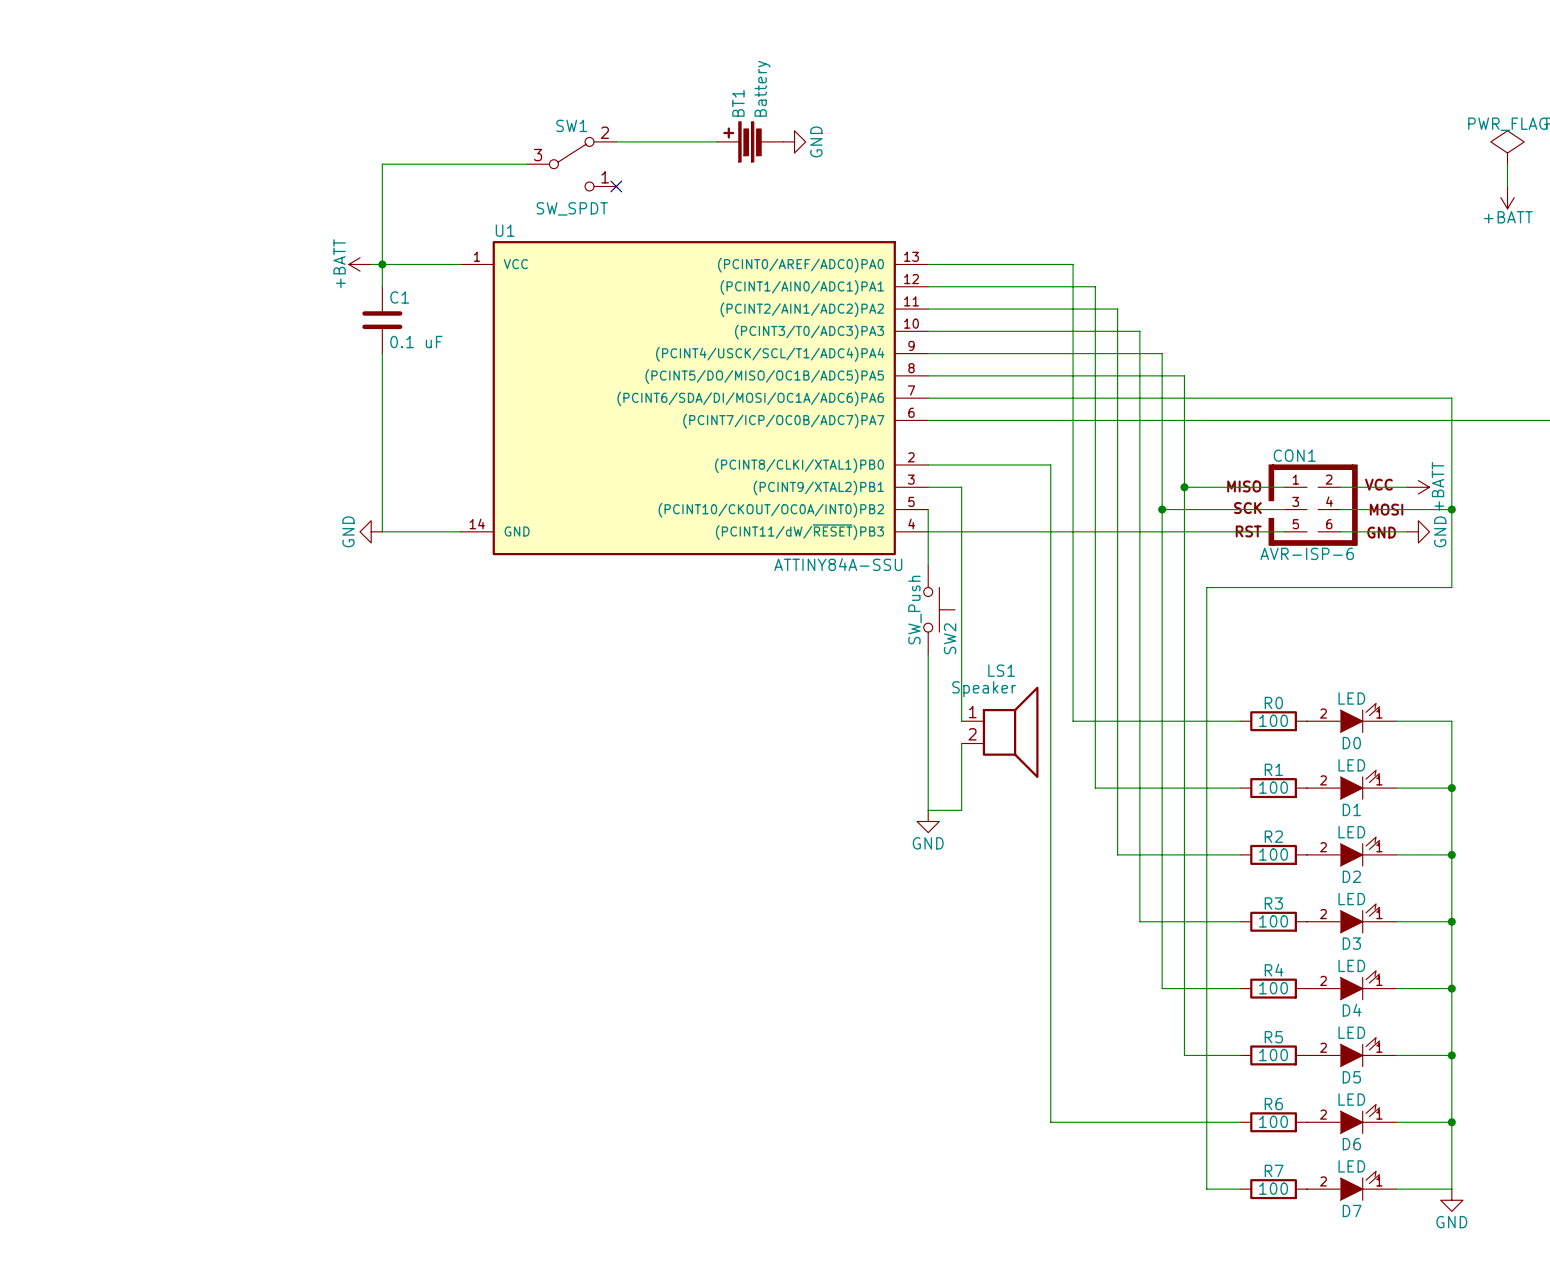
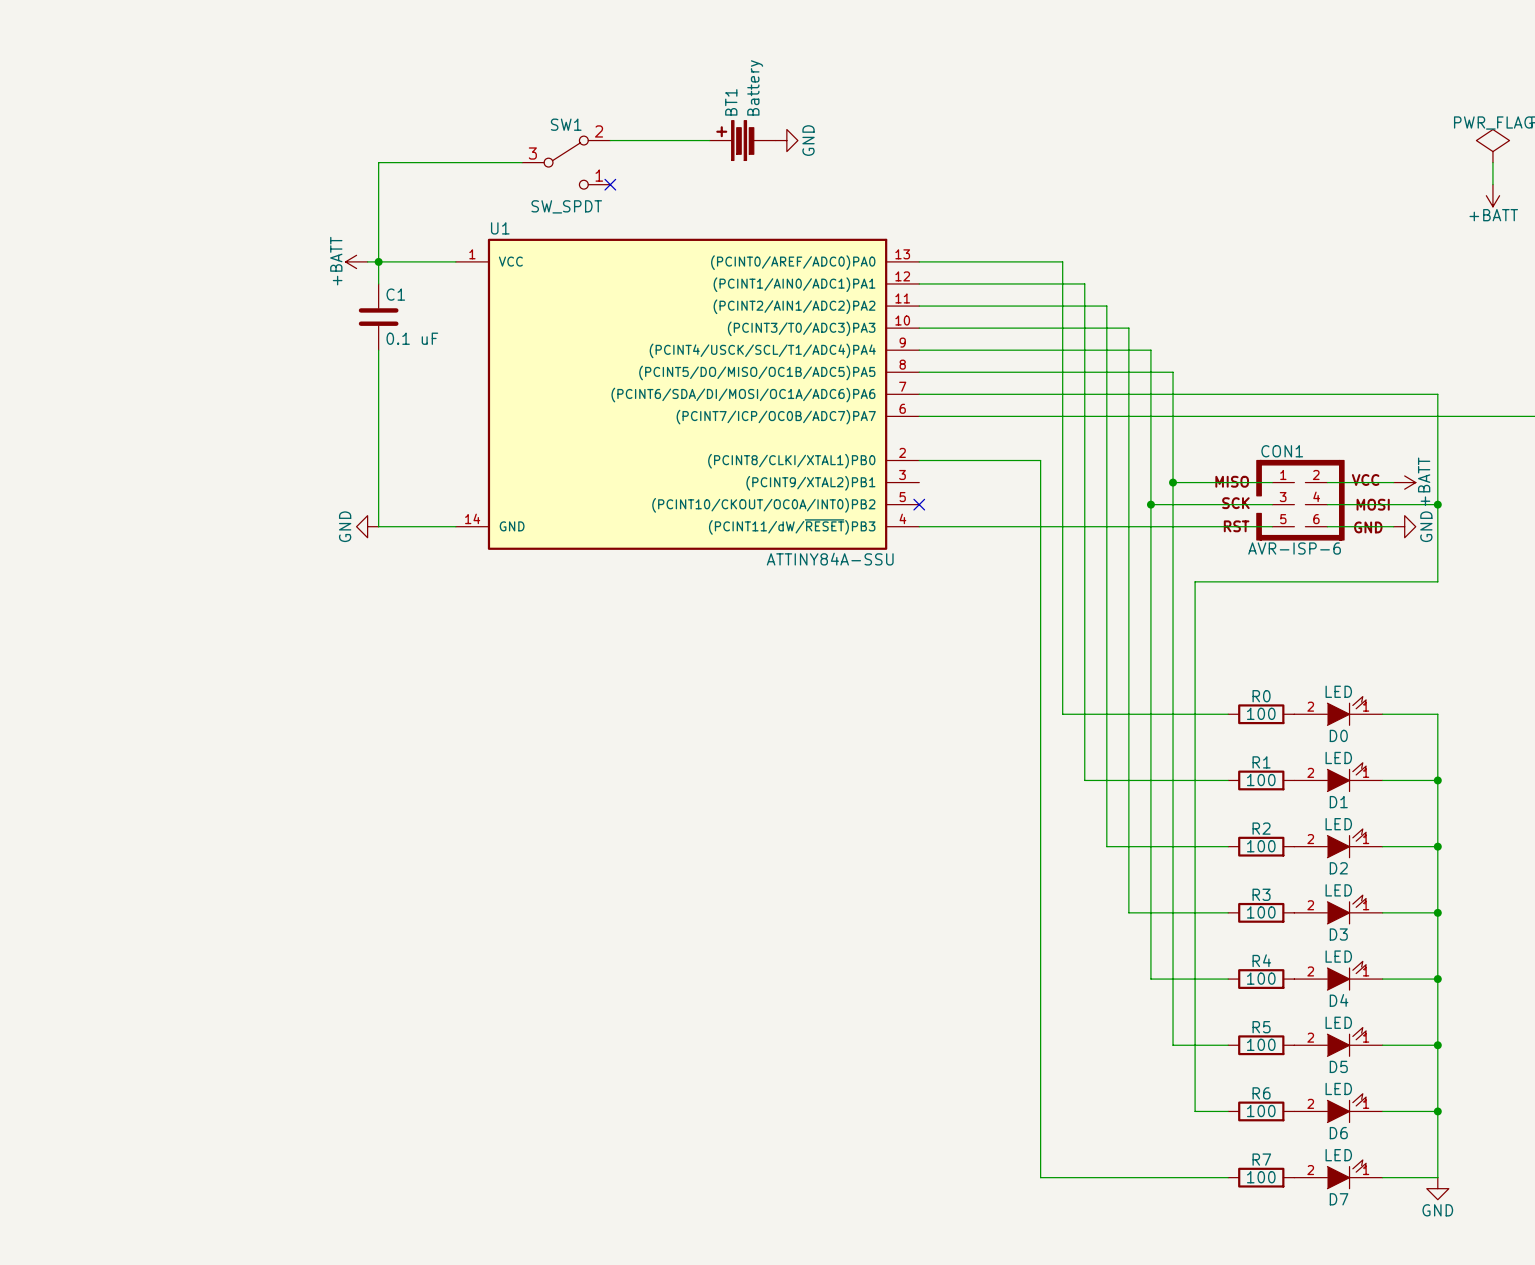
wire: (928, 487) (961, 487) (961, 721) -> none
wire: (928, 509) (928, 565) -> none
no-connect mark: none -> (919, 504)
SW2: SW_Push (939, 609) -> none
wire: (928, 654) (928, 810) (961, 810) (961, 743) -> none
LS1: Speaker (1000, 732) -> none
power symbol: GND (928, 821) -> none
wire: (1050, 1122) (1206, 1122) (1206, 1189) -> (1040, 1111) (1040, 1177) (1195, 1177)

